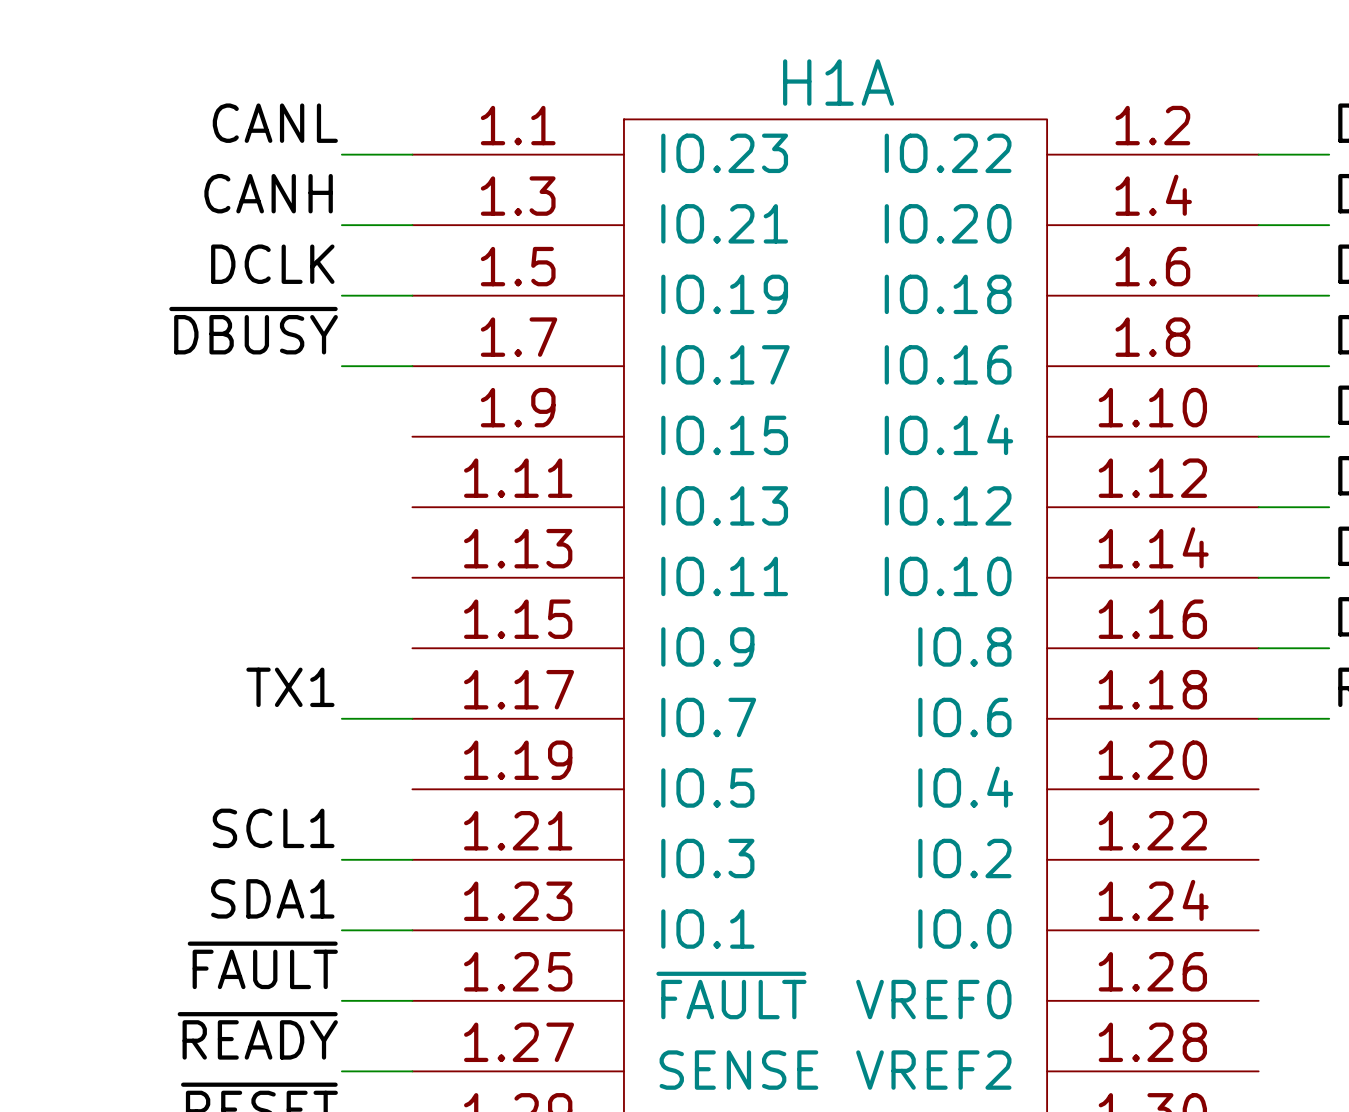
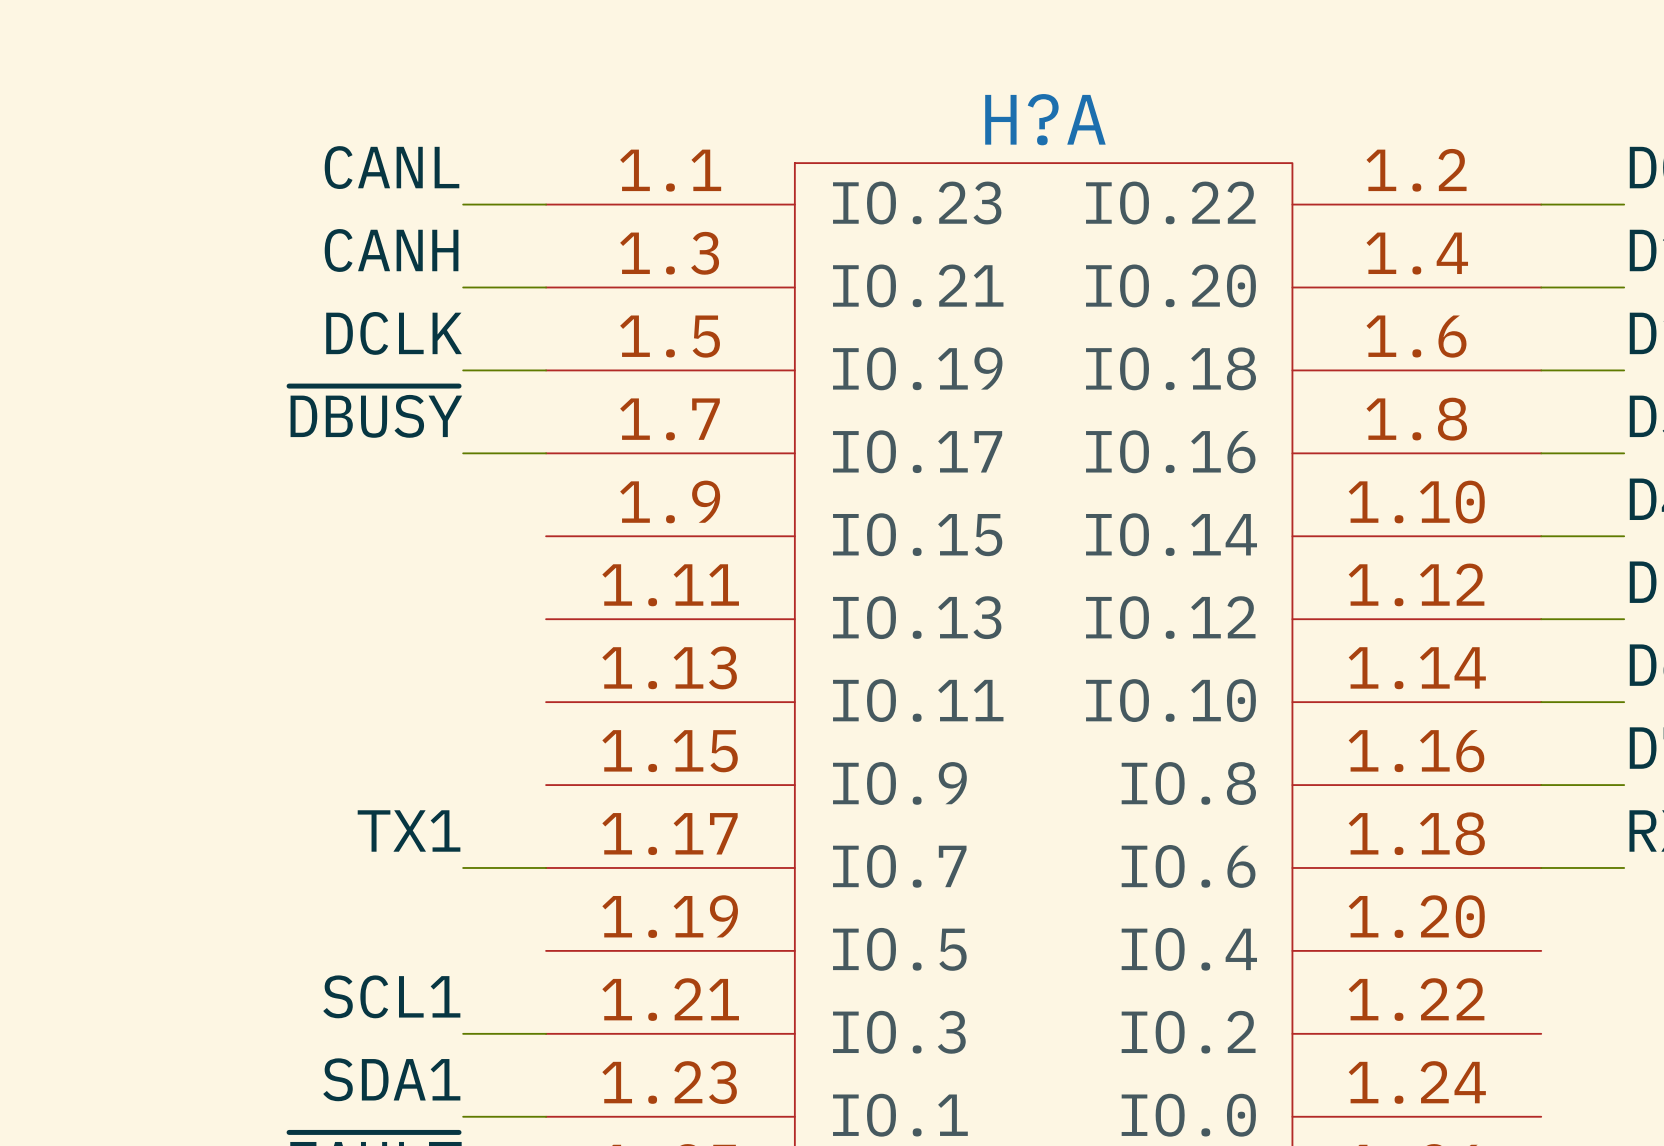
H1A name: H1A (838, 82) -> H?A (1045, 119)

